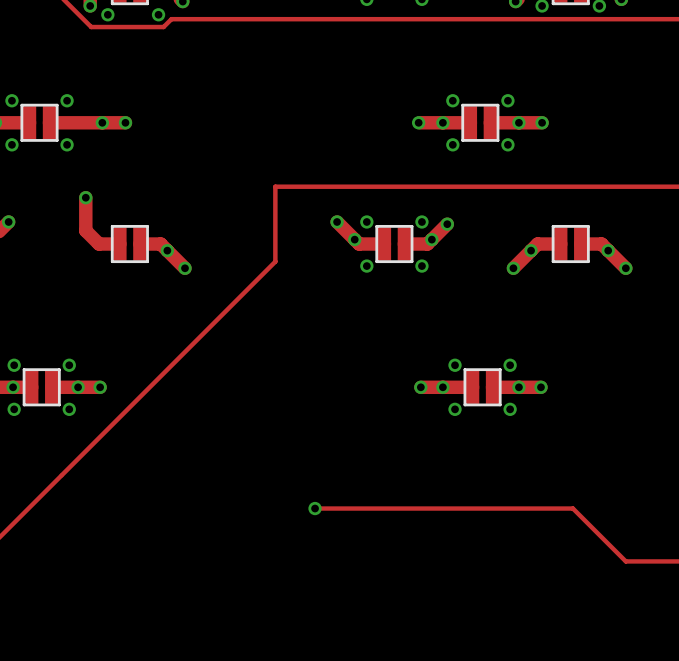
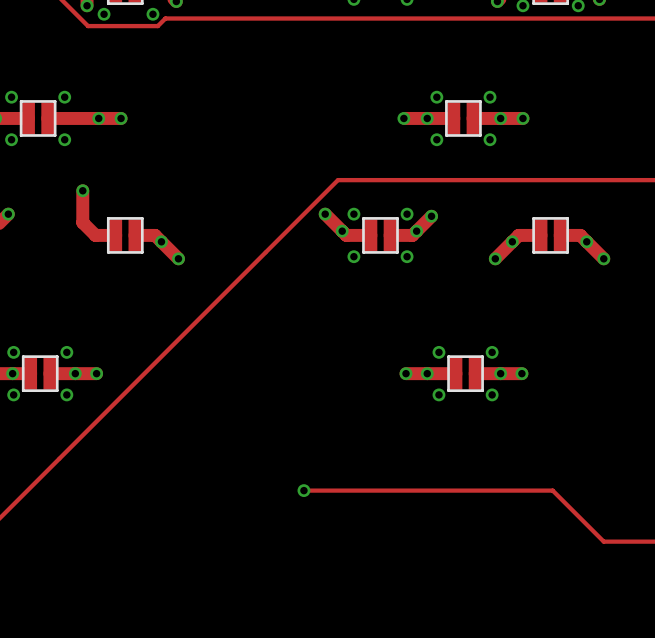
track: (350, 186) (275, 186) (275, 261) -> (337, 180) (265, 252)

